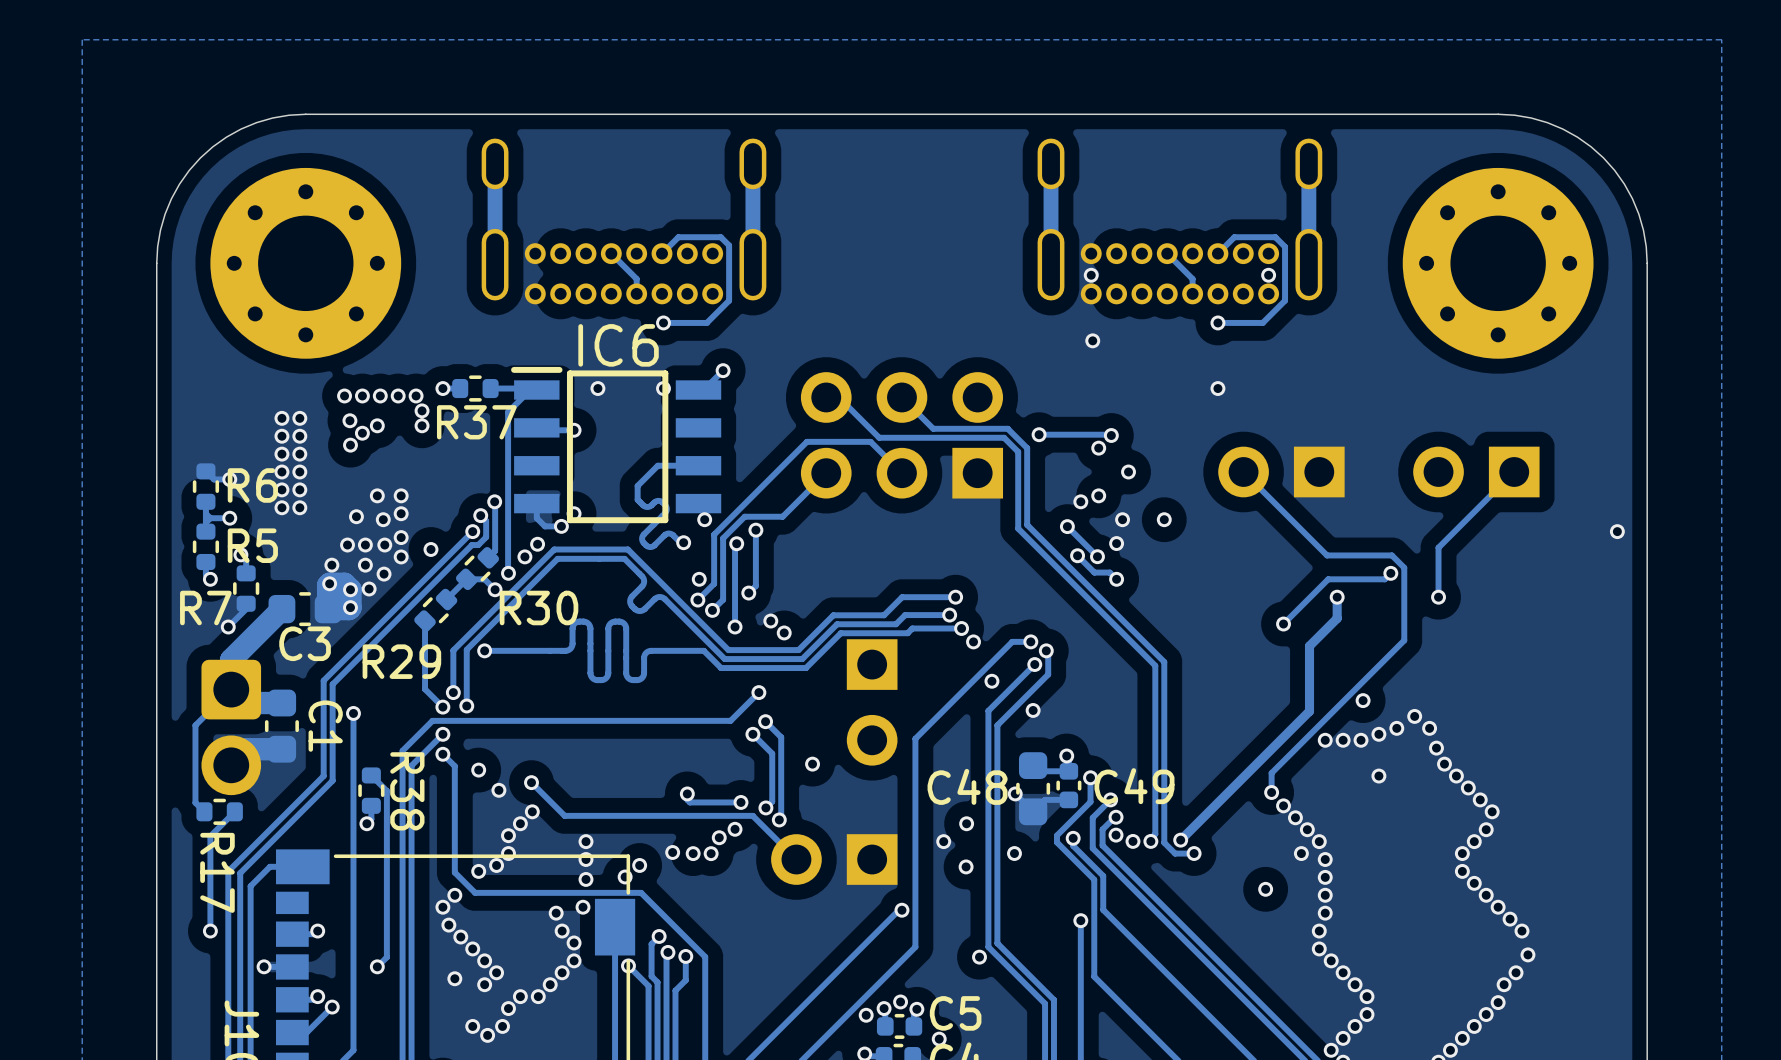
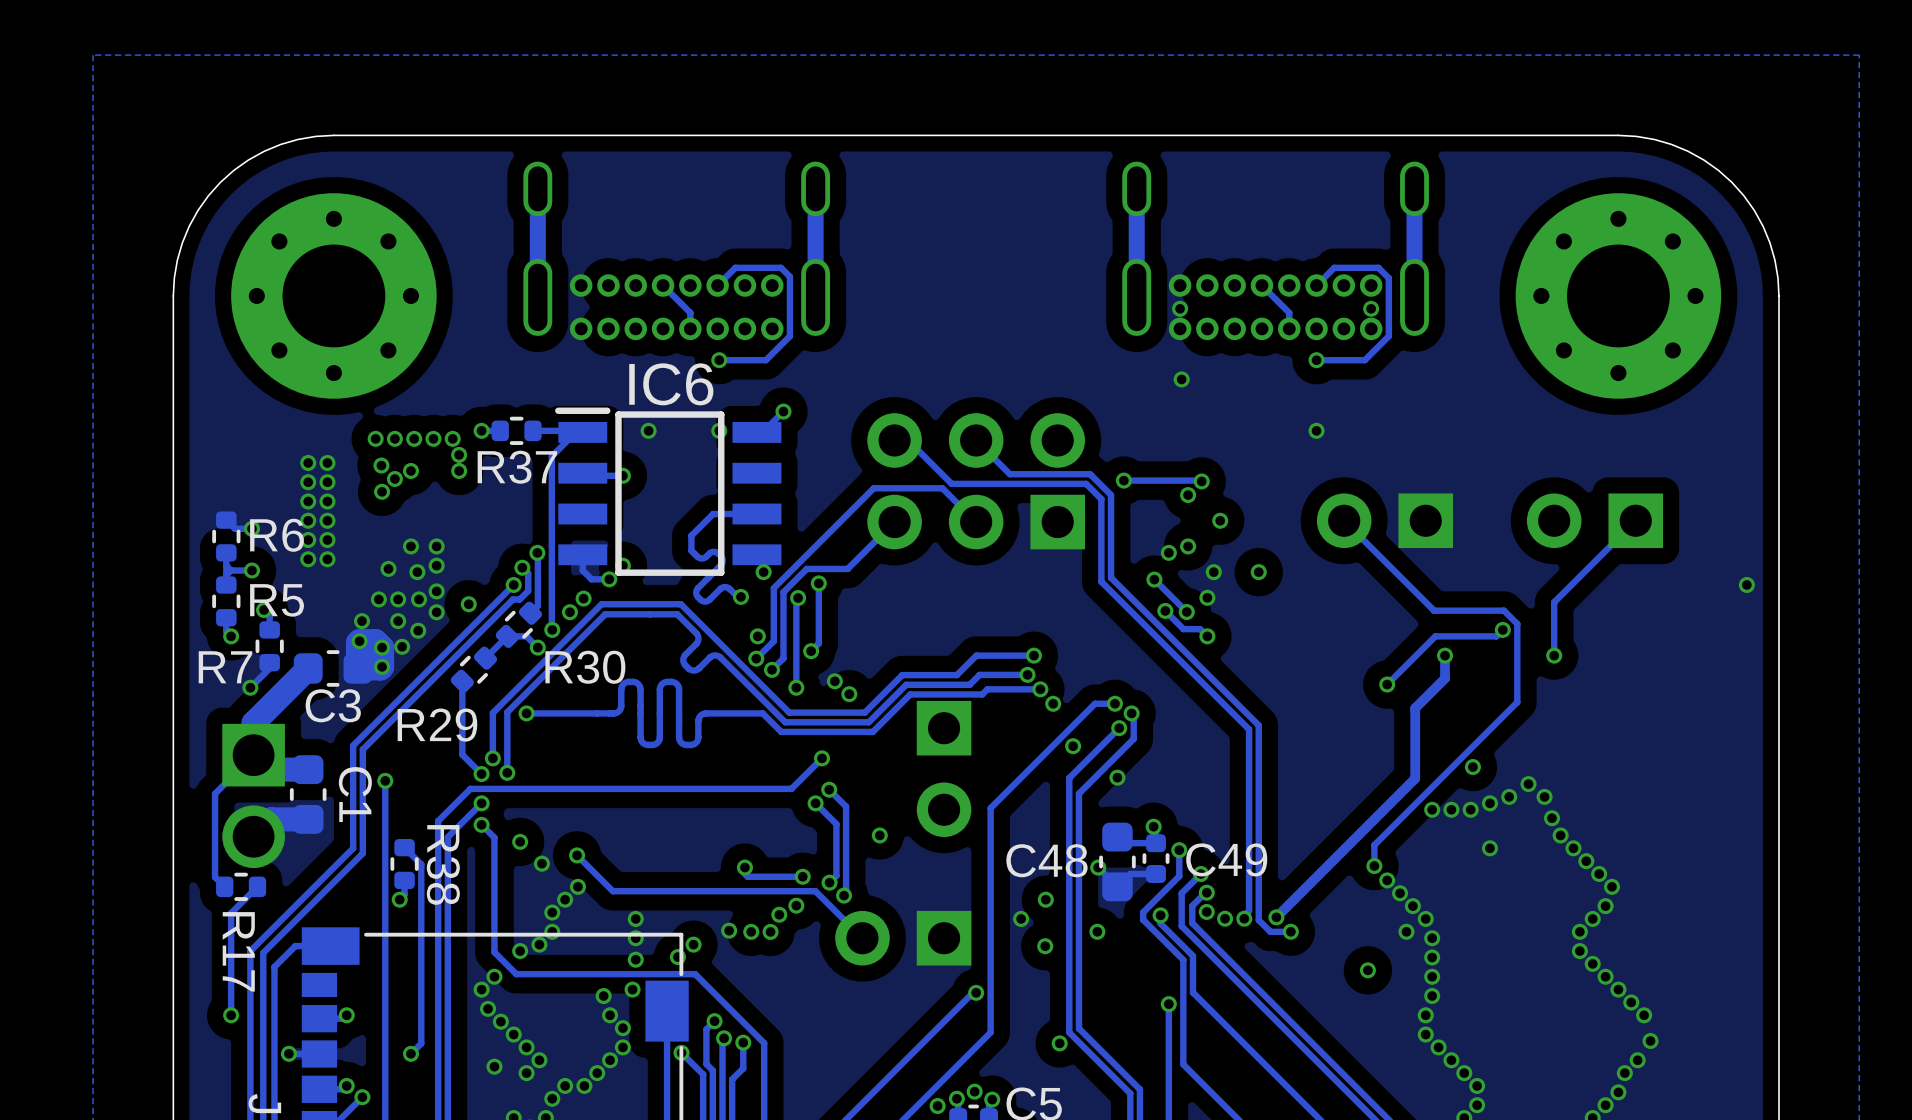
part footprint: [201, 659, 262, 796] -> [222, 723, 285, 869]

